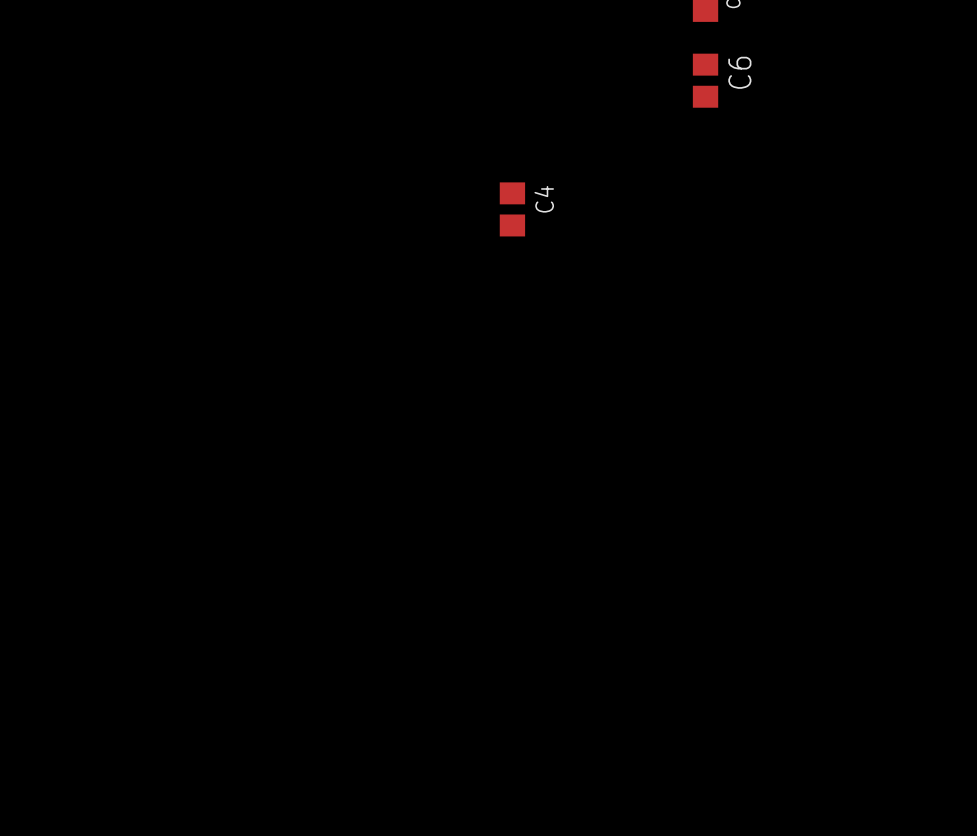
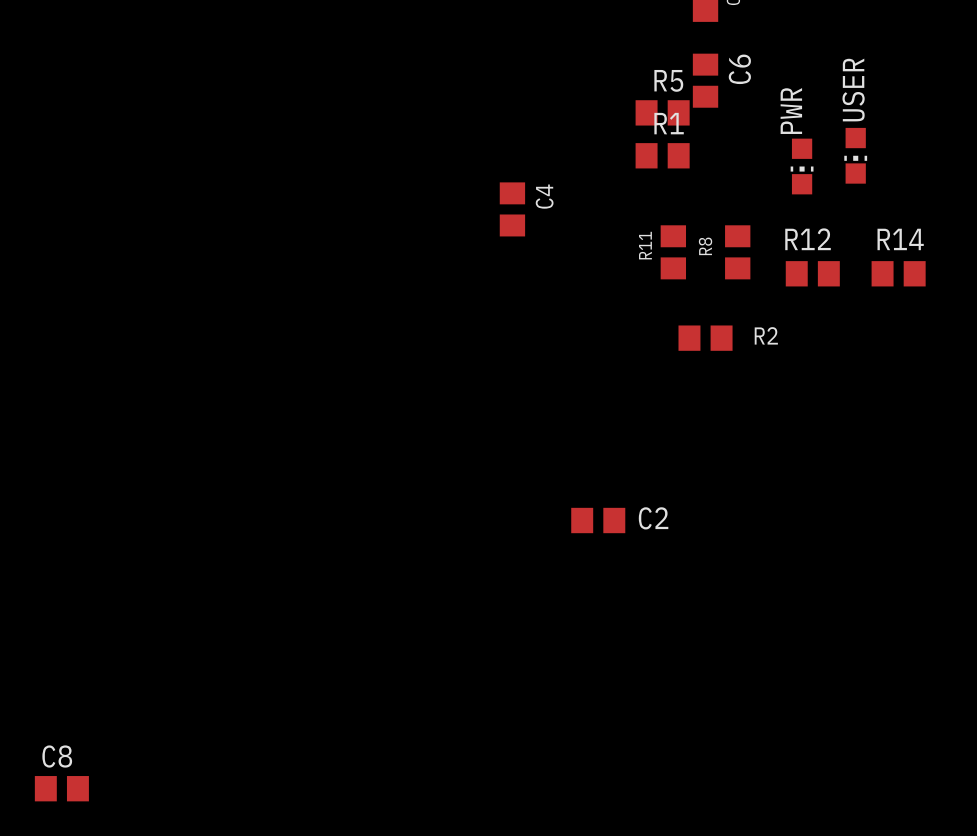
R5: none -> (662, 112)
R1: none -> (662, 155)
USER: none -> (855, 155)
PWR: none -> (802, 166)
R11: none -> (673, 252)
R8: none -> (737, 252)
R12: none -> (812, 273)
R14: none -> (898, 273)
R2: none -> (705, 338)
C2: none -> (598, 520)
C8: none -> (61, 788)

